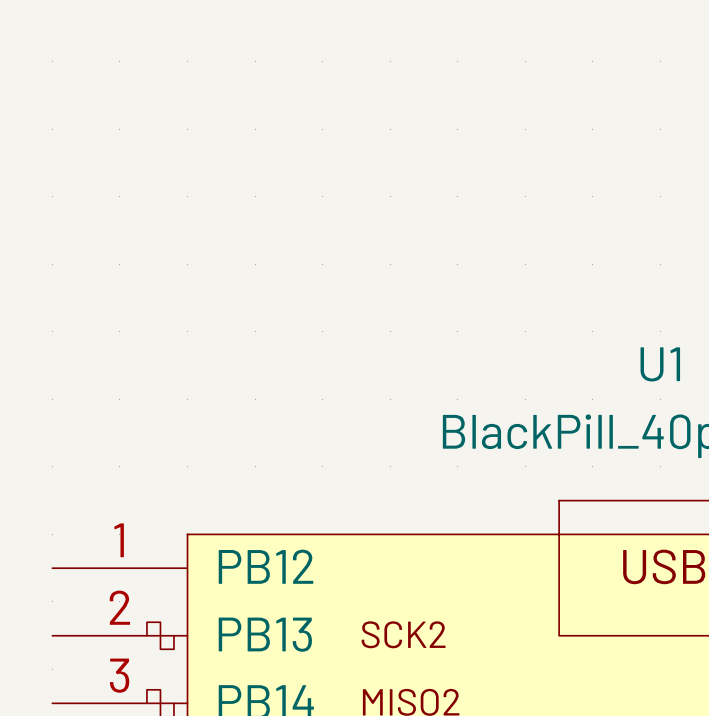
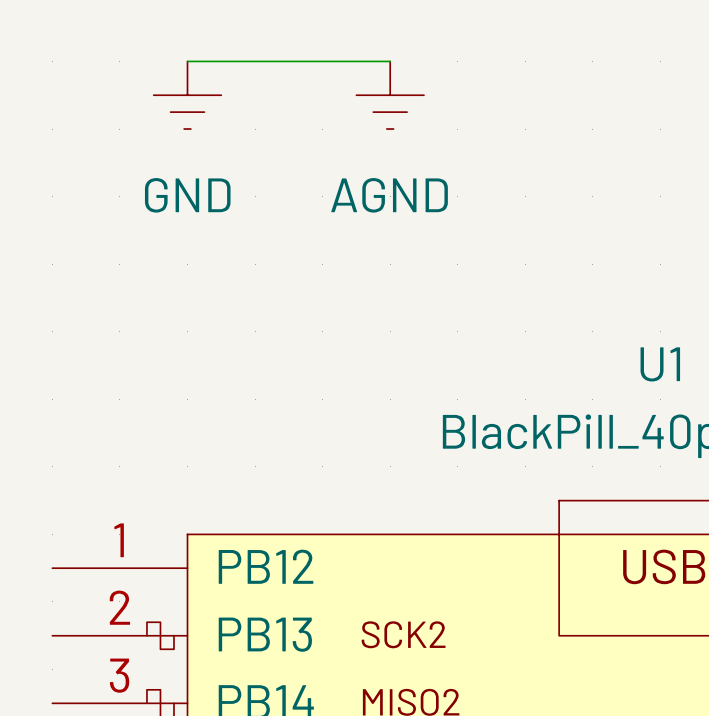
wire: none -> (187, 61) (390, 61)
power symbol: none -> GND (187, 95)
power symbol: none -> AGND (390, 95)

